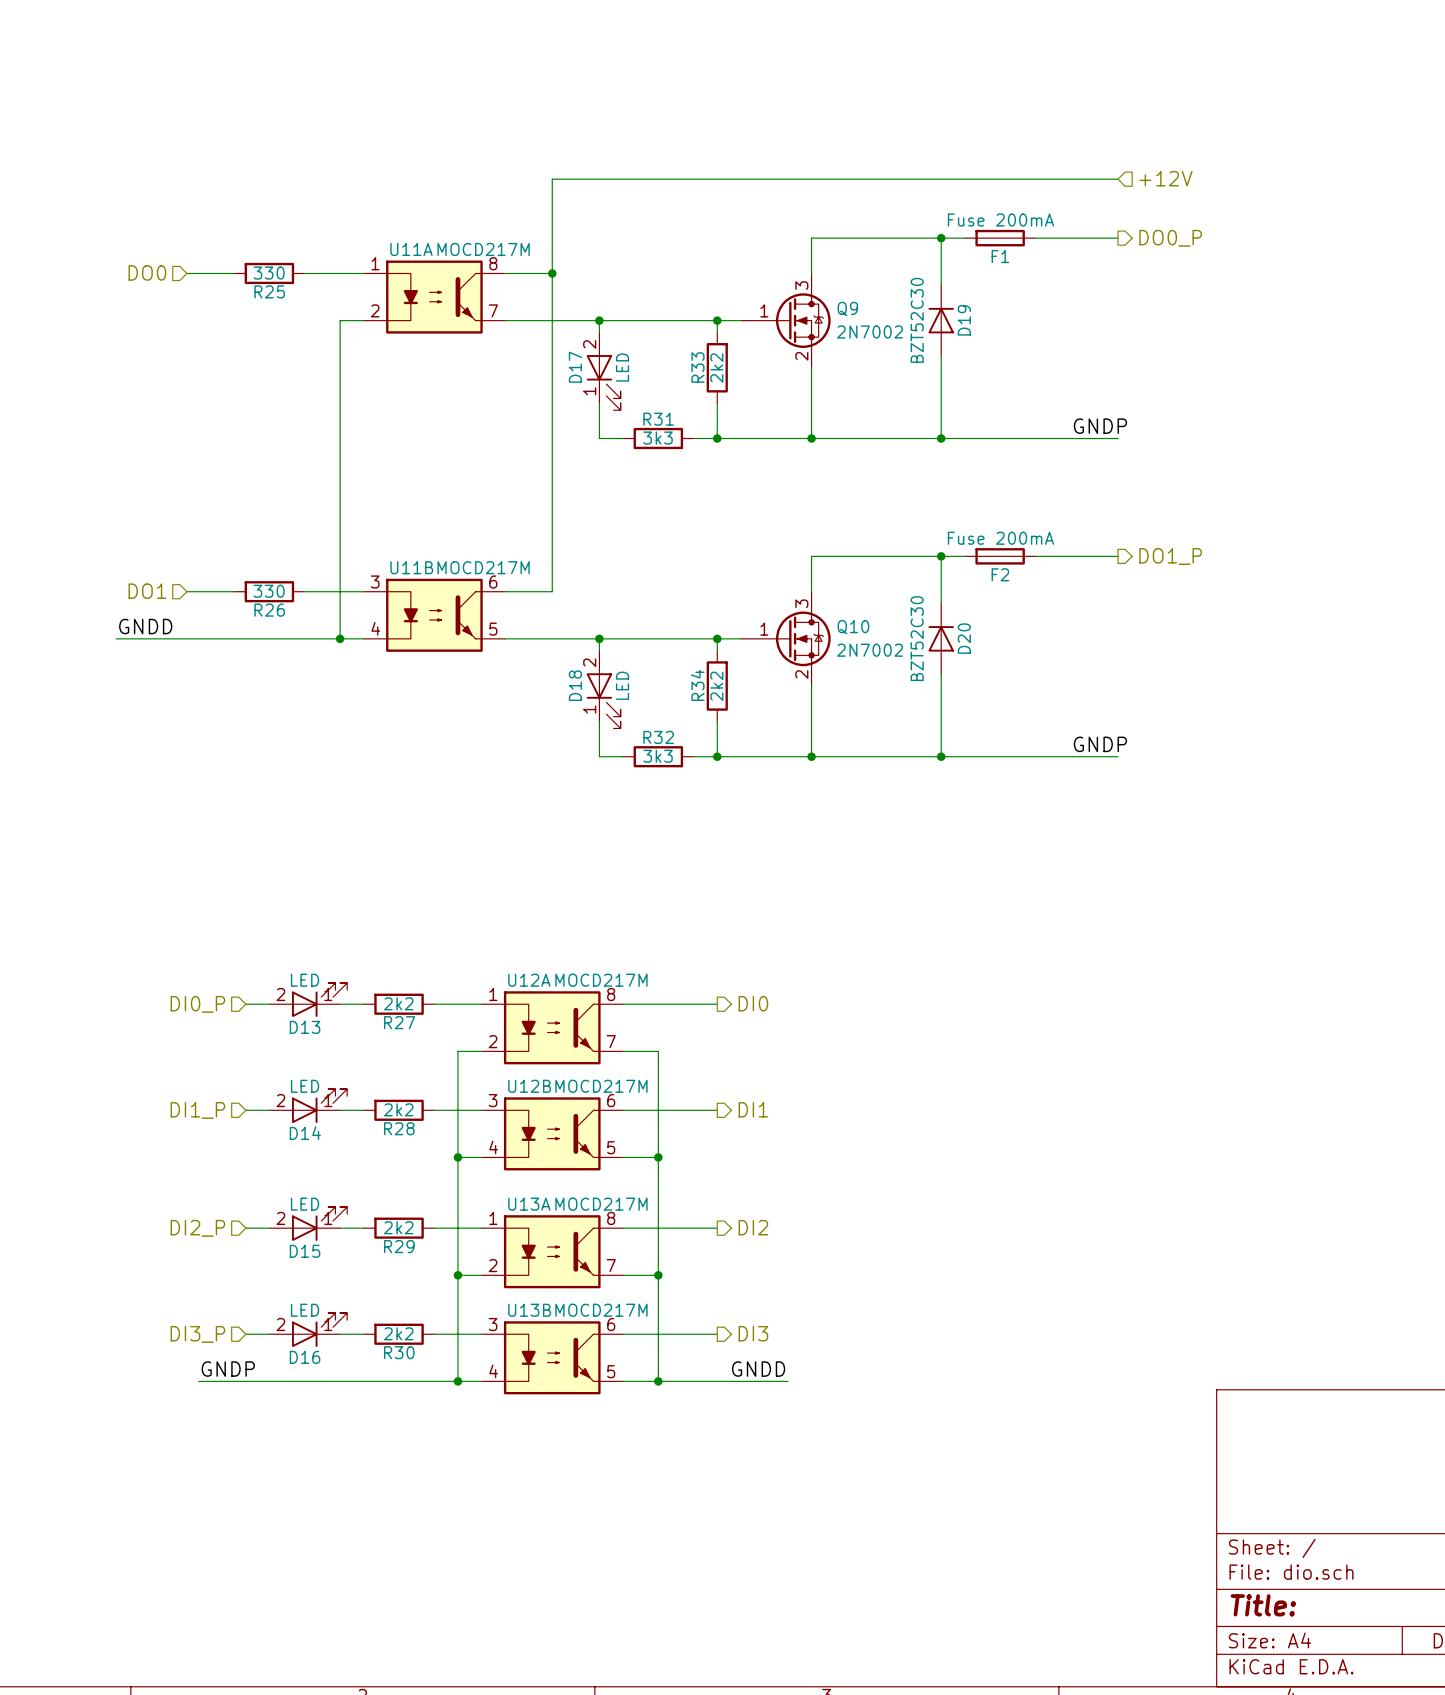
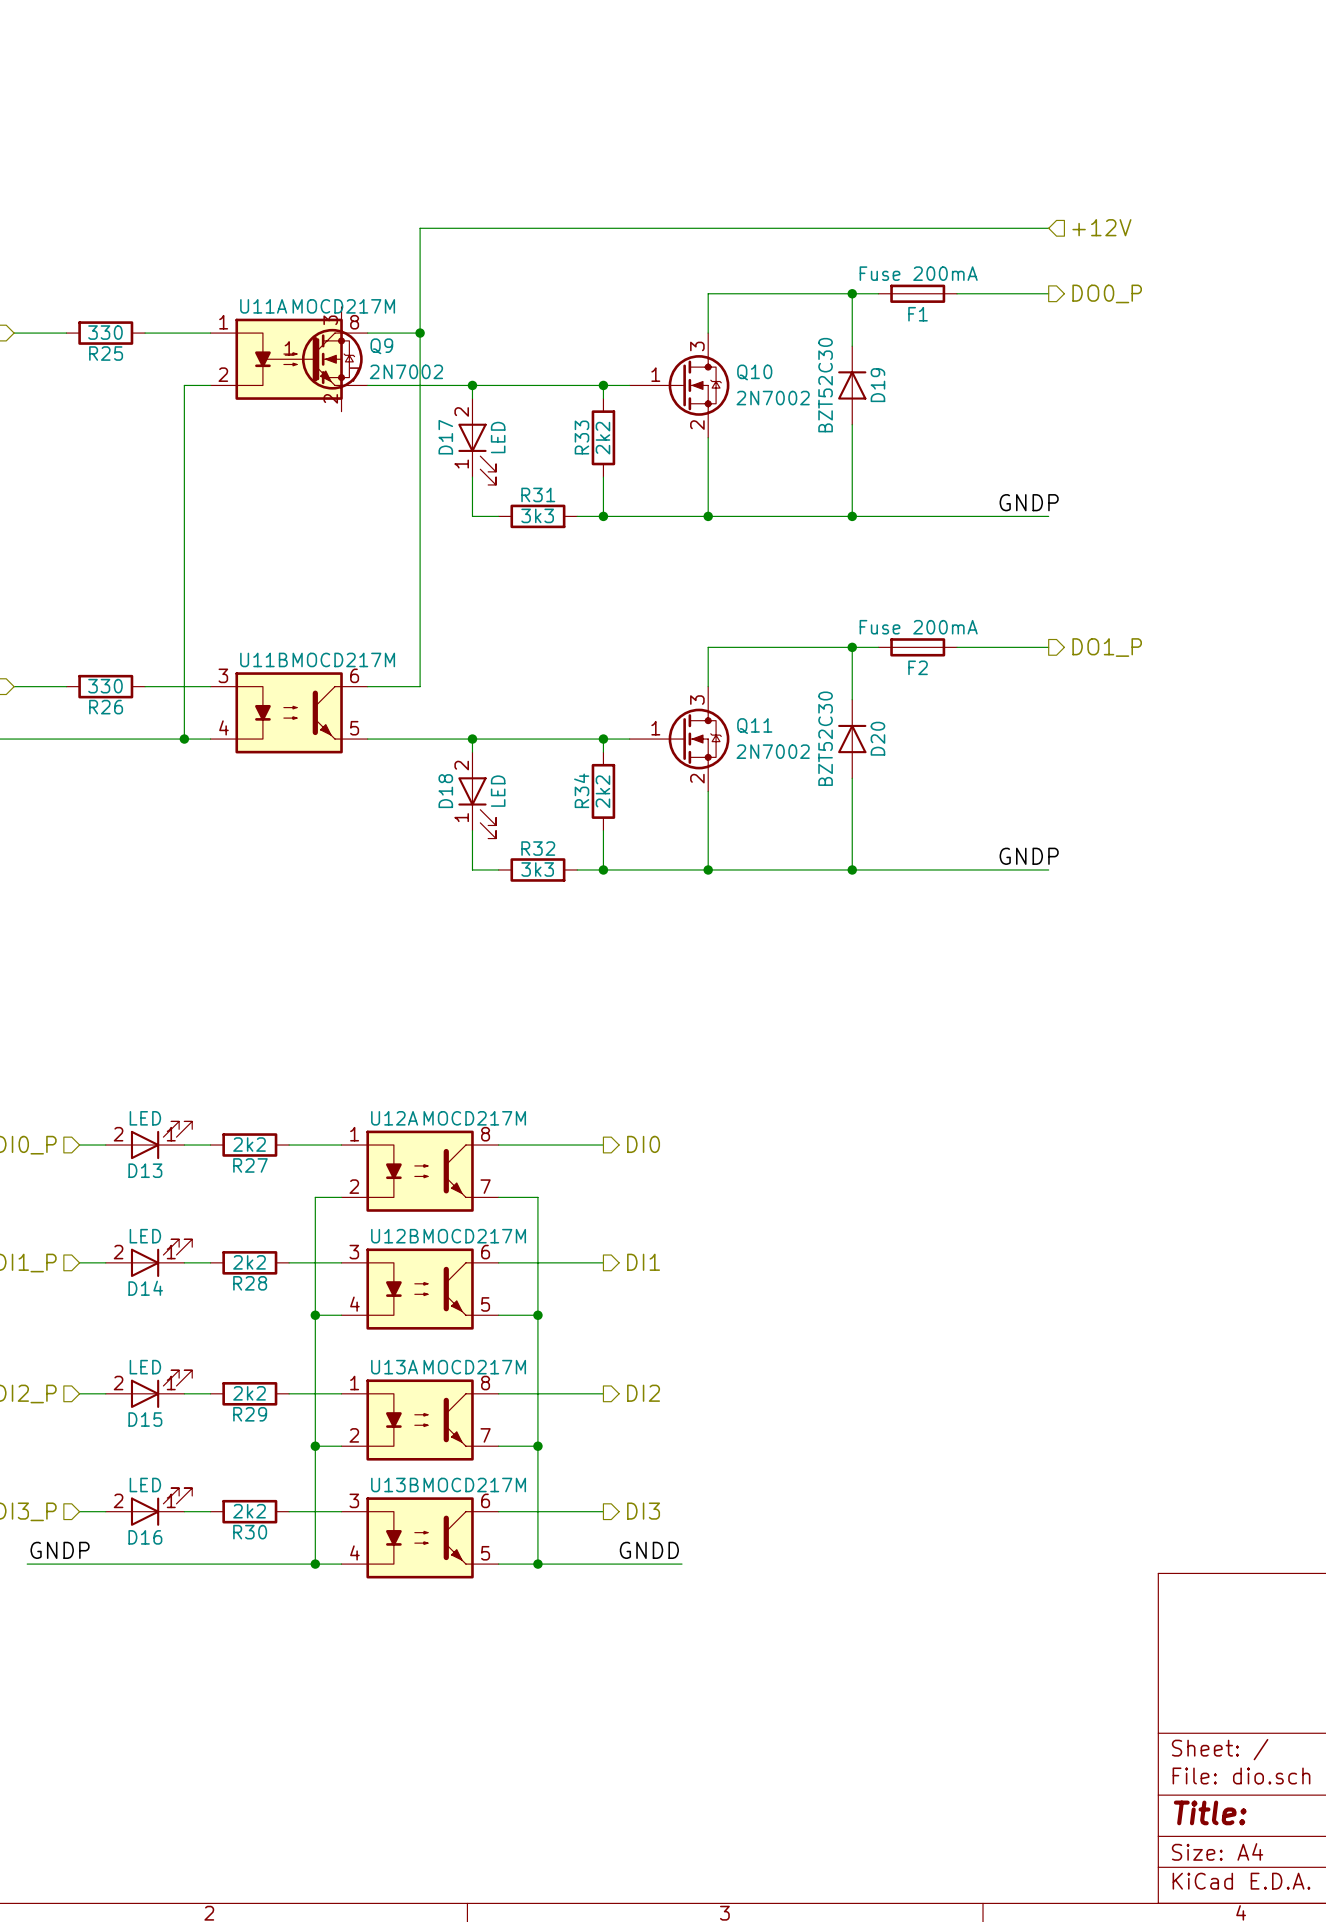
Q9: none -> 2N7002 (312, 359)
Q9 name: Q9 (847, 308) -> Q10 (754, 372)
Q10 name: Q10 (853, 627) -> Q11 (754, 726)

